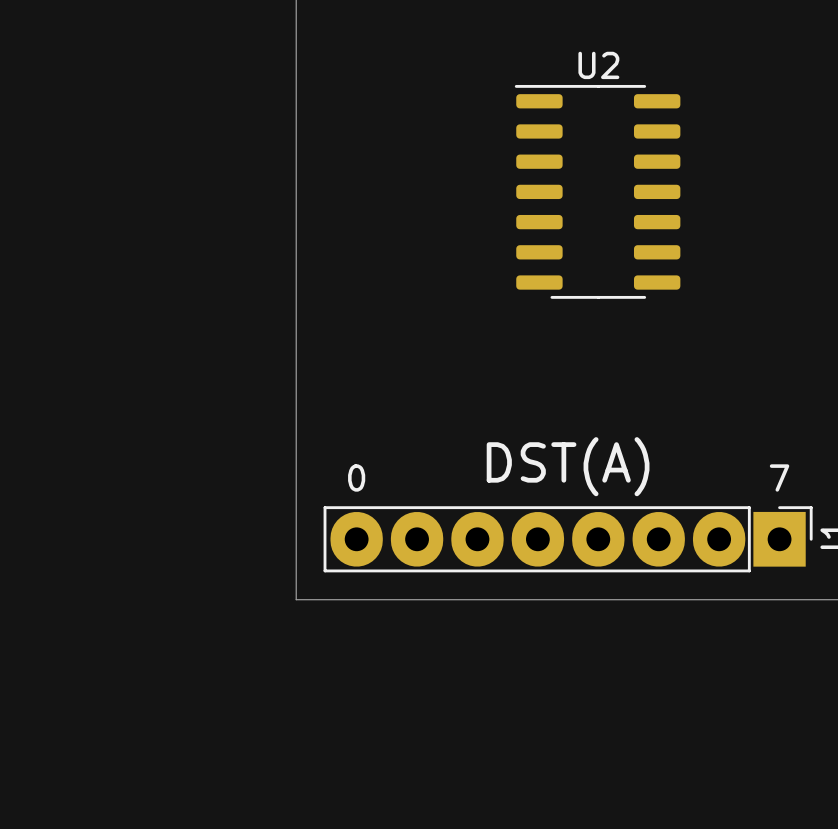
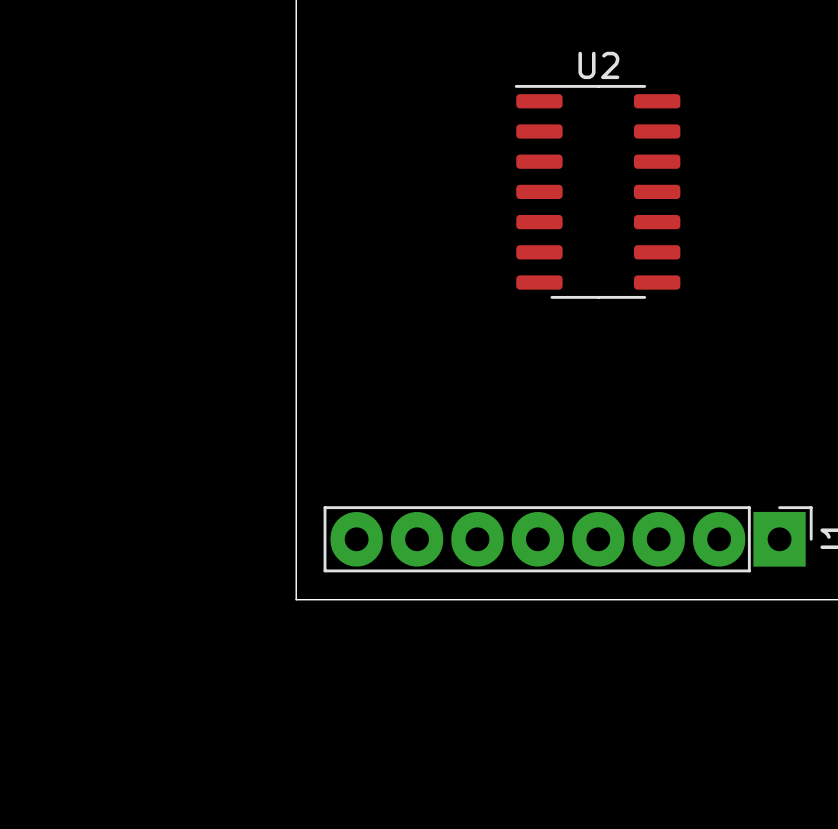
text: DST(A) (568, 466) -> none
text: 0 (356, 477) -> none
text: 7 (779, 477) -> none

